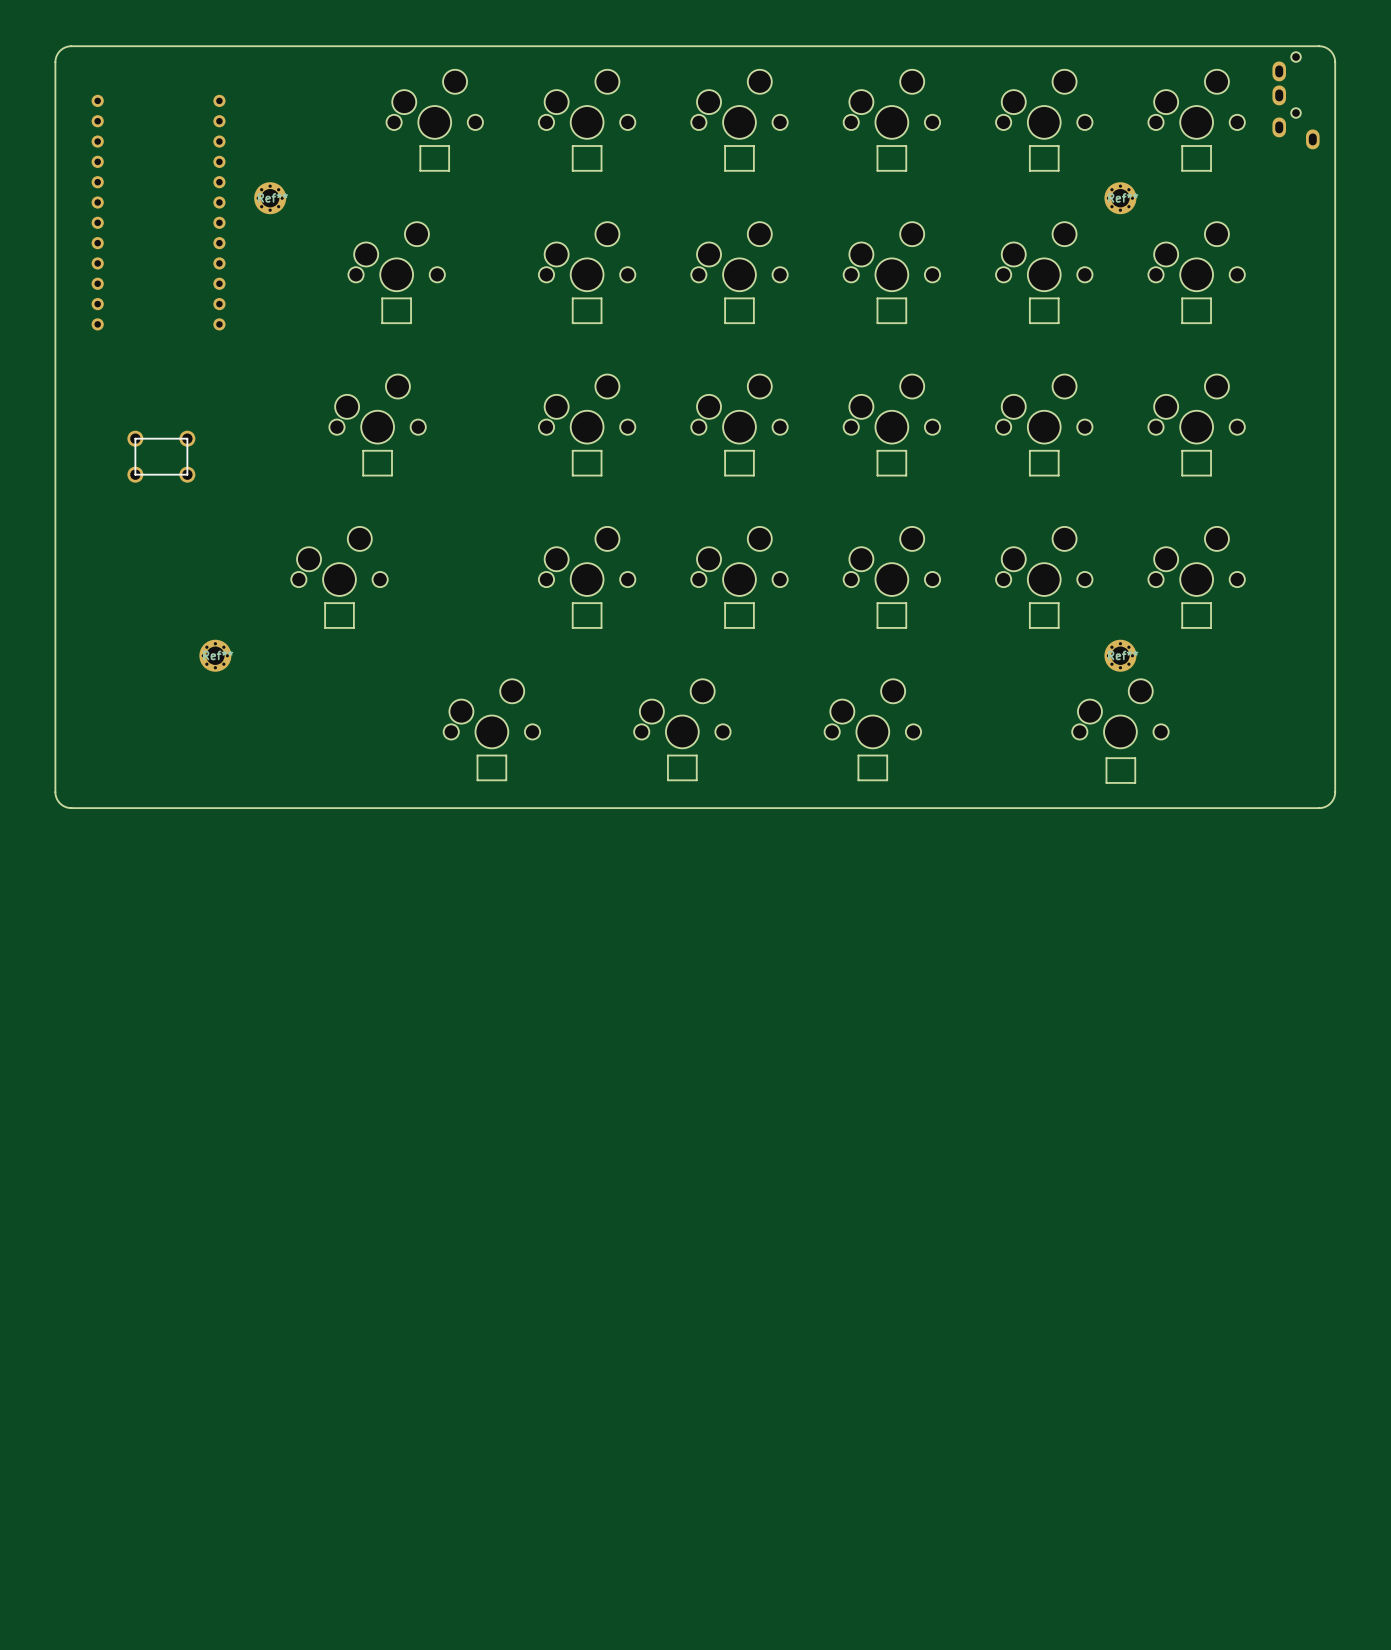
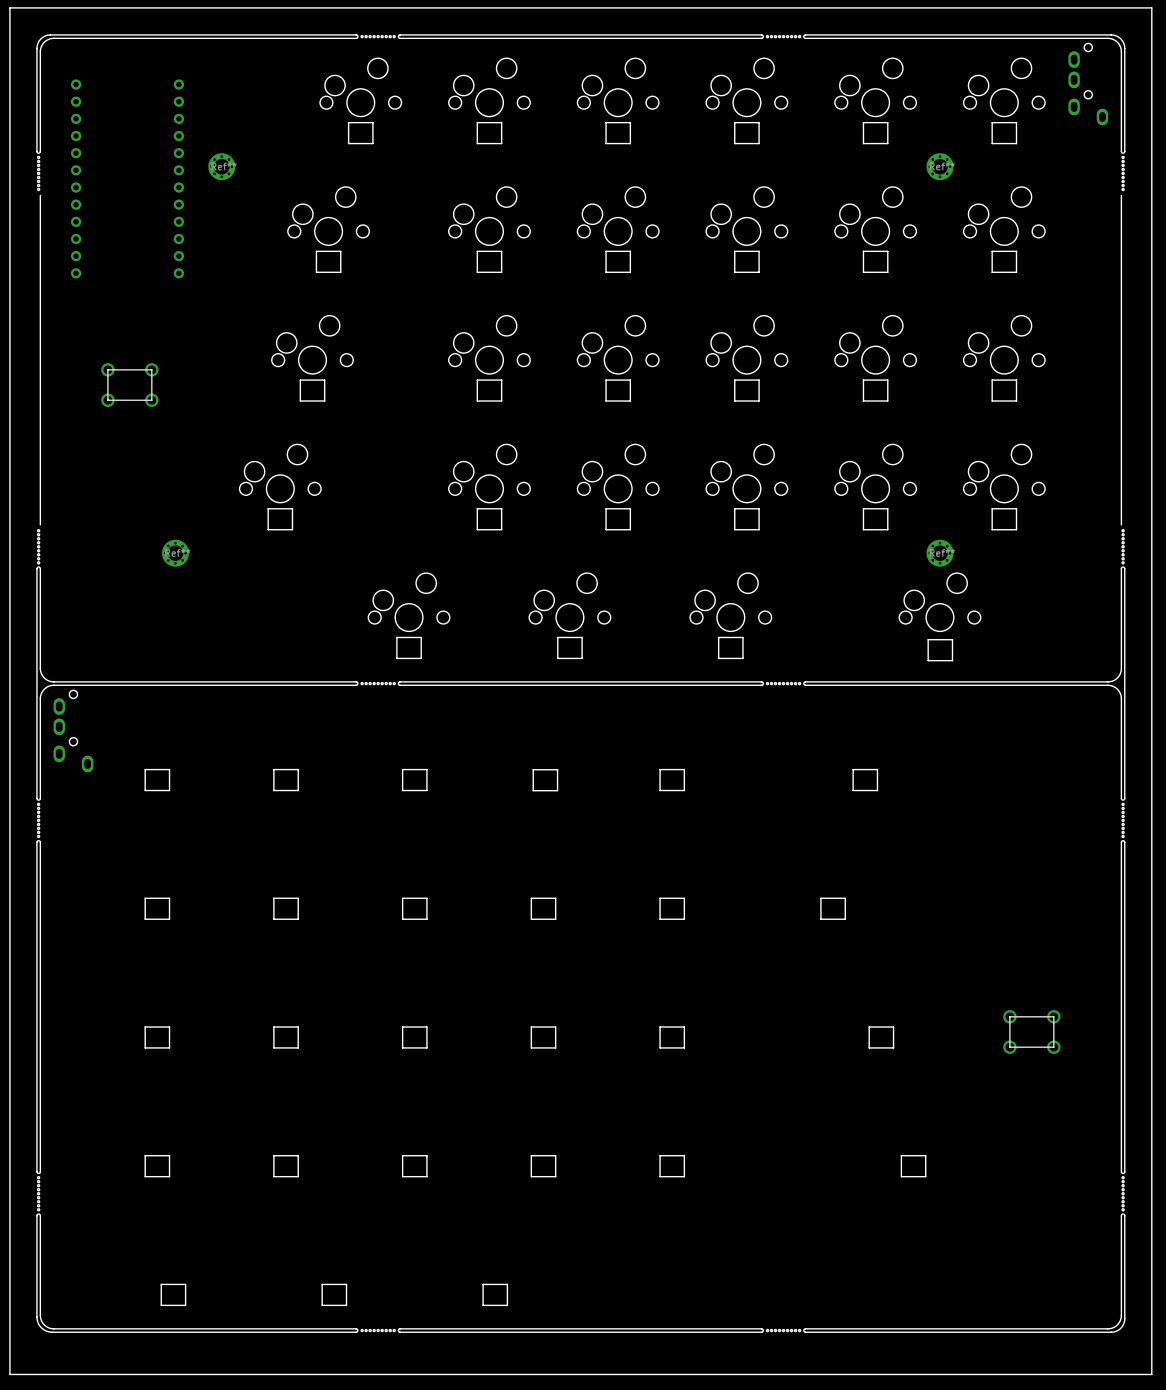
board edge: none -> (9, 7) (1151, 7) (1151, 1374) (9, 1374) (9, 7)
part: none -> (378, 36)
part: none -> (783, 36)
board edge: (429, 46) (481, 46) -> (761, 38) (763, 36) (761, 34) (400, 34) (398, 36) (400, 38)
board edge: (909, 46) (961, 46) -> none
board edge: (55, 180) (55, 232) -> (40, 151) (38, 153) (36, 151) (36, 48) (39, 40) (46, 35) (356, 34) (357, 36) (356, 38)
board edge: (1335, 180) (1335, 232) -> (1121, 151) (1123, 153) (1124, 151) (1124, 48) (1121, 40) (1115, 35) (805, 34) (803, 36) (805, 38)
part: none -> (38, 173)
part: none -> (1123, 173)
board edge: (55, 622) (55, 674) -> (356, 681) (357, 683) (356, 685) (49, 686) (43, 690) (40, 697) (40, 798) (38, 800) (36, 568) (38, 567) (40, 568)
board edge: (1335, 622) (1335, 674) -> (805, 681) (803, 683) (805, 685) (1112, 686) (1118, 690) (1121, 697) (1121, 798) (1123, 800) (1124, 568) (1123, 567) (1121, 568)
part: none -> (38, 546)
part: none -> (1123, 546)
board edge: (429, 808) (481, 808) -> (761, 681) (763, 683) (761, 685) (400, 685) (398, 683) (400, 681)
board edge: (909, 808) (961, 808) -> none
part: none -> (378, 683)
part: none -> (783, 683)
part: none -> (73, 731)
part: none -> (157, 780)
part: none -> (286, 780)
part: none -> (414, 780)
part: none -> (545, 780)
part: none -> (672, 780)
part: none -> (865, 780)
part: none -> (38, 820)
part: none -> (1123, 820)
board edge: none -> (36, 842) (36, 1171) (38, 1173) (40, 1171) (40, 842) (38, 840) (36, 842)
board edge: none -> (1121, 842) (1121, 1171) (1123, 1173) (1124, 1171) (1124, 842) (1123, 840) (1121, 842)
part: none -> (157, 908)
part: none -> (286, 908)
part: none -> (414, 908)
part: none -> (543, 908)
part: none -> (672, 908)
part: none -> (833, 908)
part: none -> (1031, 1032)
part: none -> (157, 1037)
part: none -> (286, 1037)
part: none -> (414, 1037)
part: none -> (543, 1037)
part: none -> (672, 1037)
part: none -> (881, 1037)
part: none -> (157, 1166)
part: none -> (286, 1166)
part: none -> (414, 1166)
part: none -> (543, 1166)
part: none -> (672, 1166)
part: none -> (913, 1166)
part: none -> (38, 1193)
part: none -> (1123, 1193)
board edge: none -> (36, 1215) (37, 1319) (40, 1326) (46, 1331) (357, 1331) (356, 1328) (49, 1328) (43, 1323) (40, 1316) (40, 1215) (38, 1213) (36, 1215)
board edge: none -> (1121, 1215) (1121, 1316) (1118, 1323) (1112, 1328) (805, 1328) (803, 1331) (1115, 1331) (1121, 1327) (1124, 1318) (1124, 1215) (1123, 1213) (1121, 1215)
part: none -> (173, 1294)
part: none -> (334, 1294)
part: none -> (495, 1294)
board edge: none -> (400, 1328) (761, 1328) (763, 1330) (761, 1332) (400, 1332) (398, 1330) (400, 1328)
part: none -> (378, 1330)
part: none -> (783, 1330)

